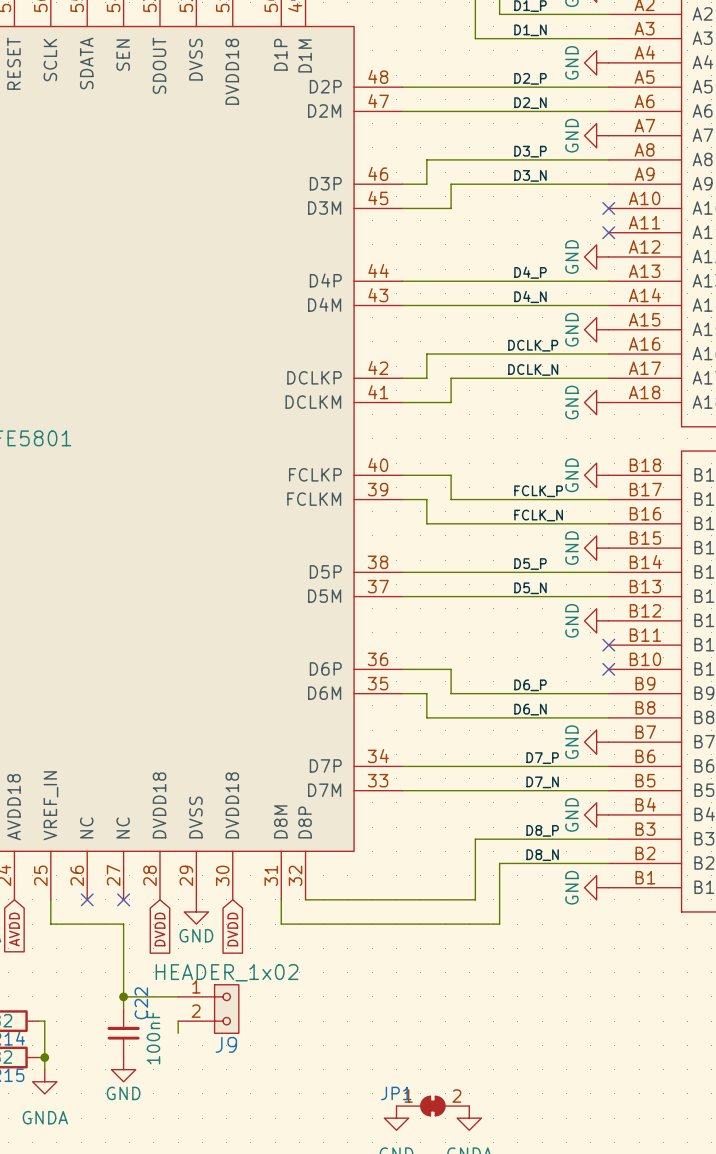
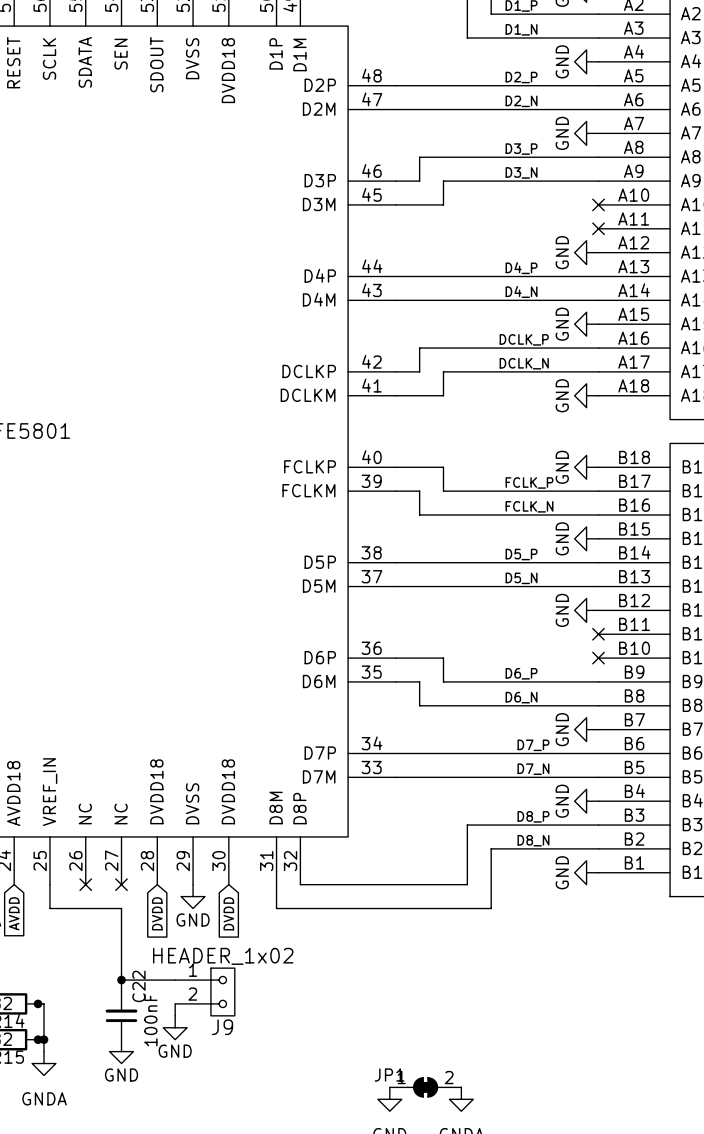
junction: none -> (38, 1003)
power symbol: none -> GND (175, 1027)
junction: none -> (38, 1039)

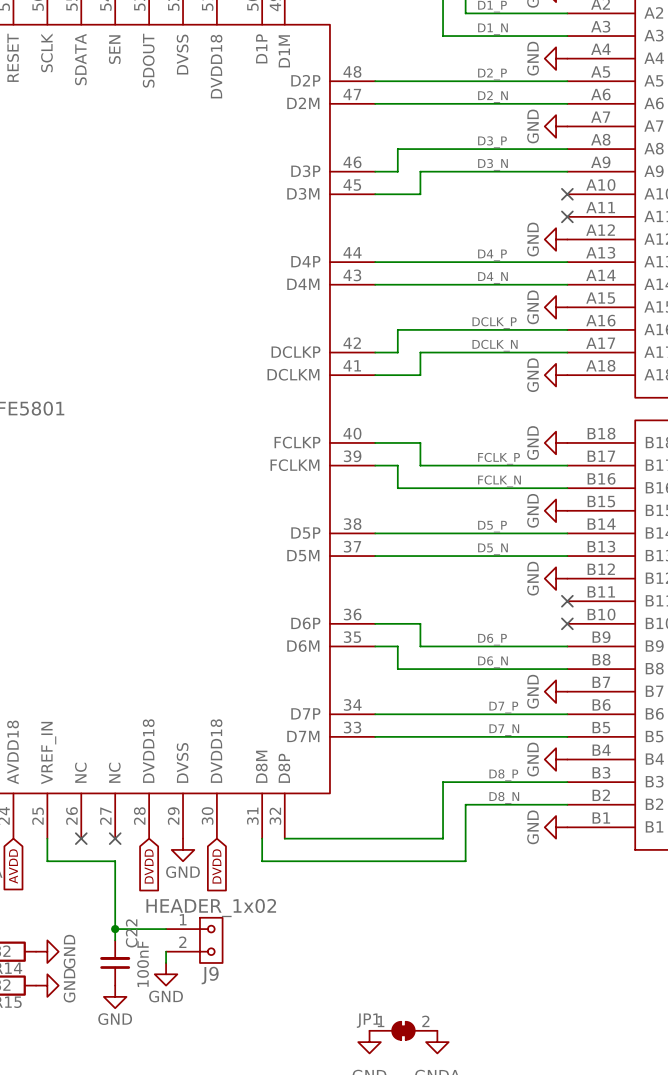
wire: (38, 1003) (44, 1003) (44, 1051) -> none
junction: (38, 1003) -> none
power symbol: none -> GND (47, 951)
junction: (38, 1039) -> none
junction: (44, 1039) -> none
power symbol: none -> GND (47, 985)
power symbol: GNDA (44, 1063) -> none

